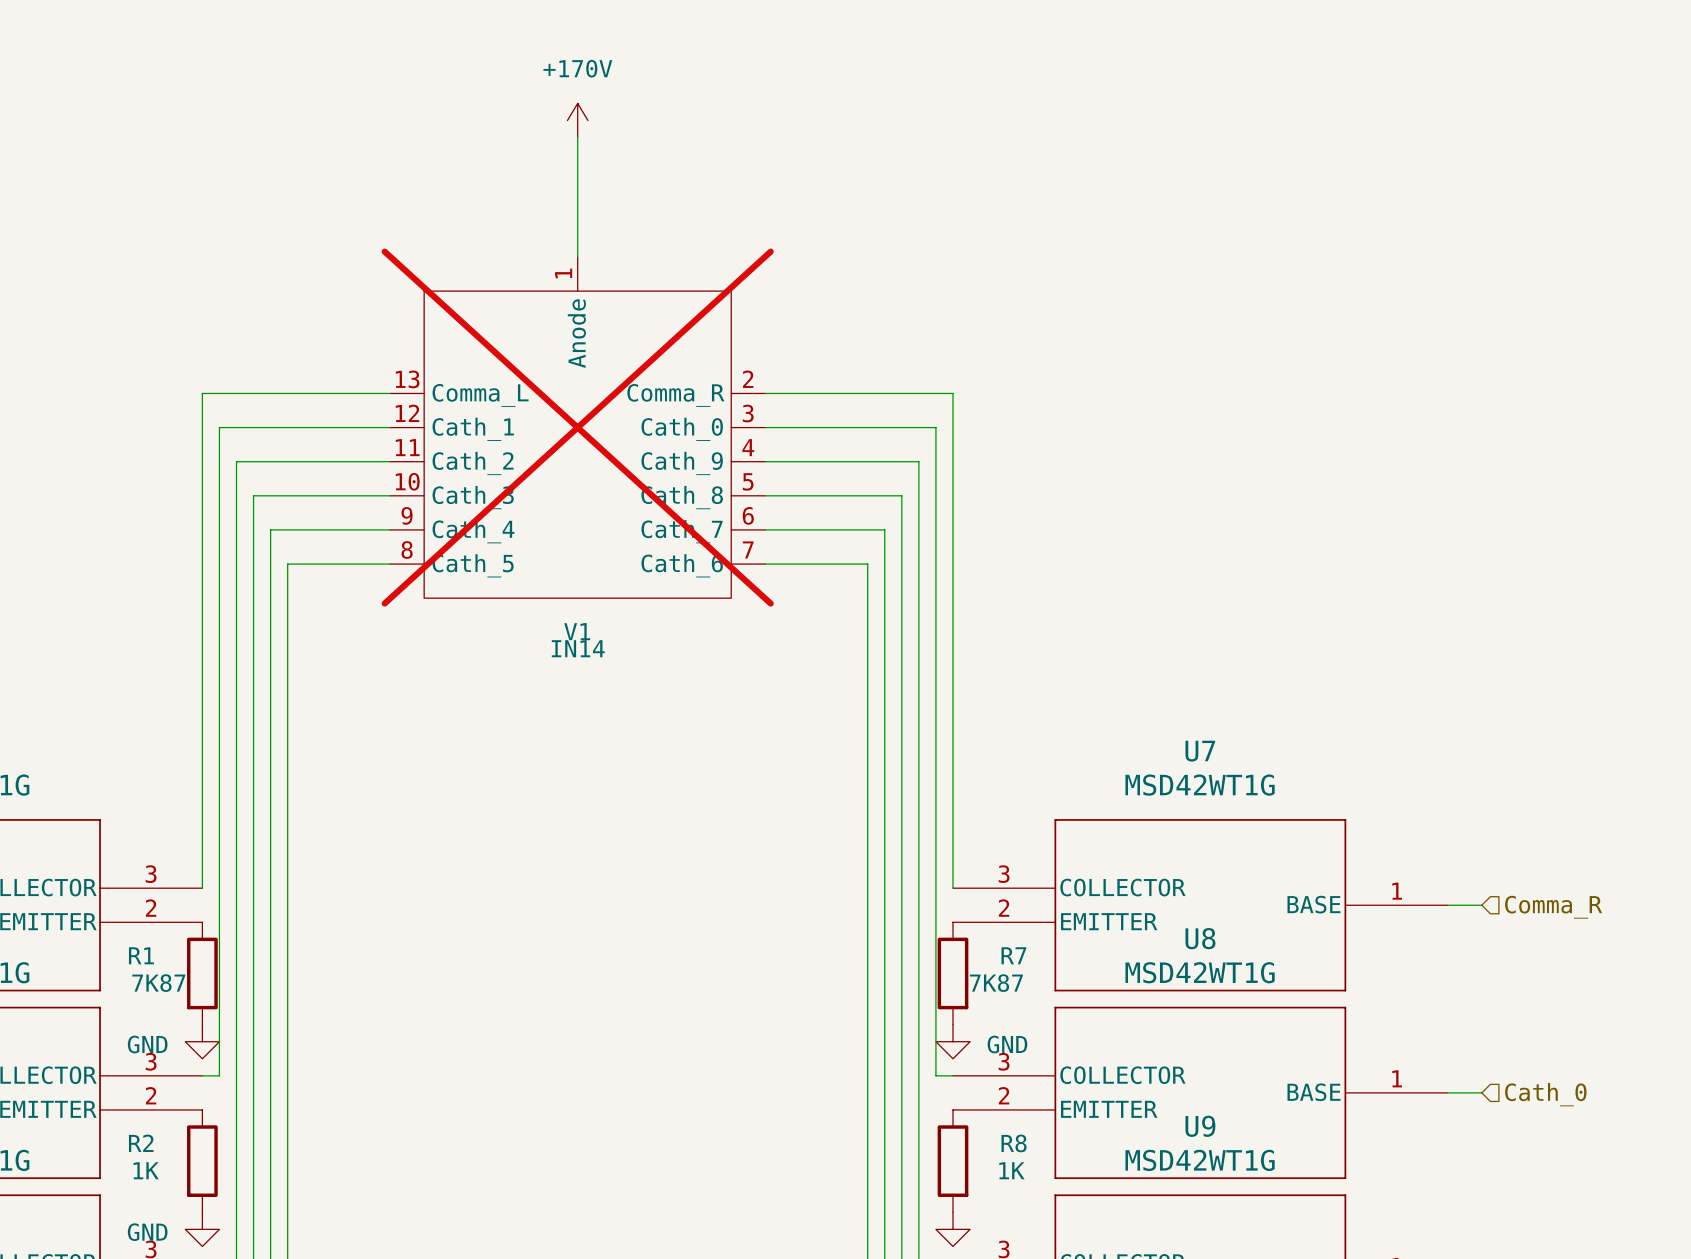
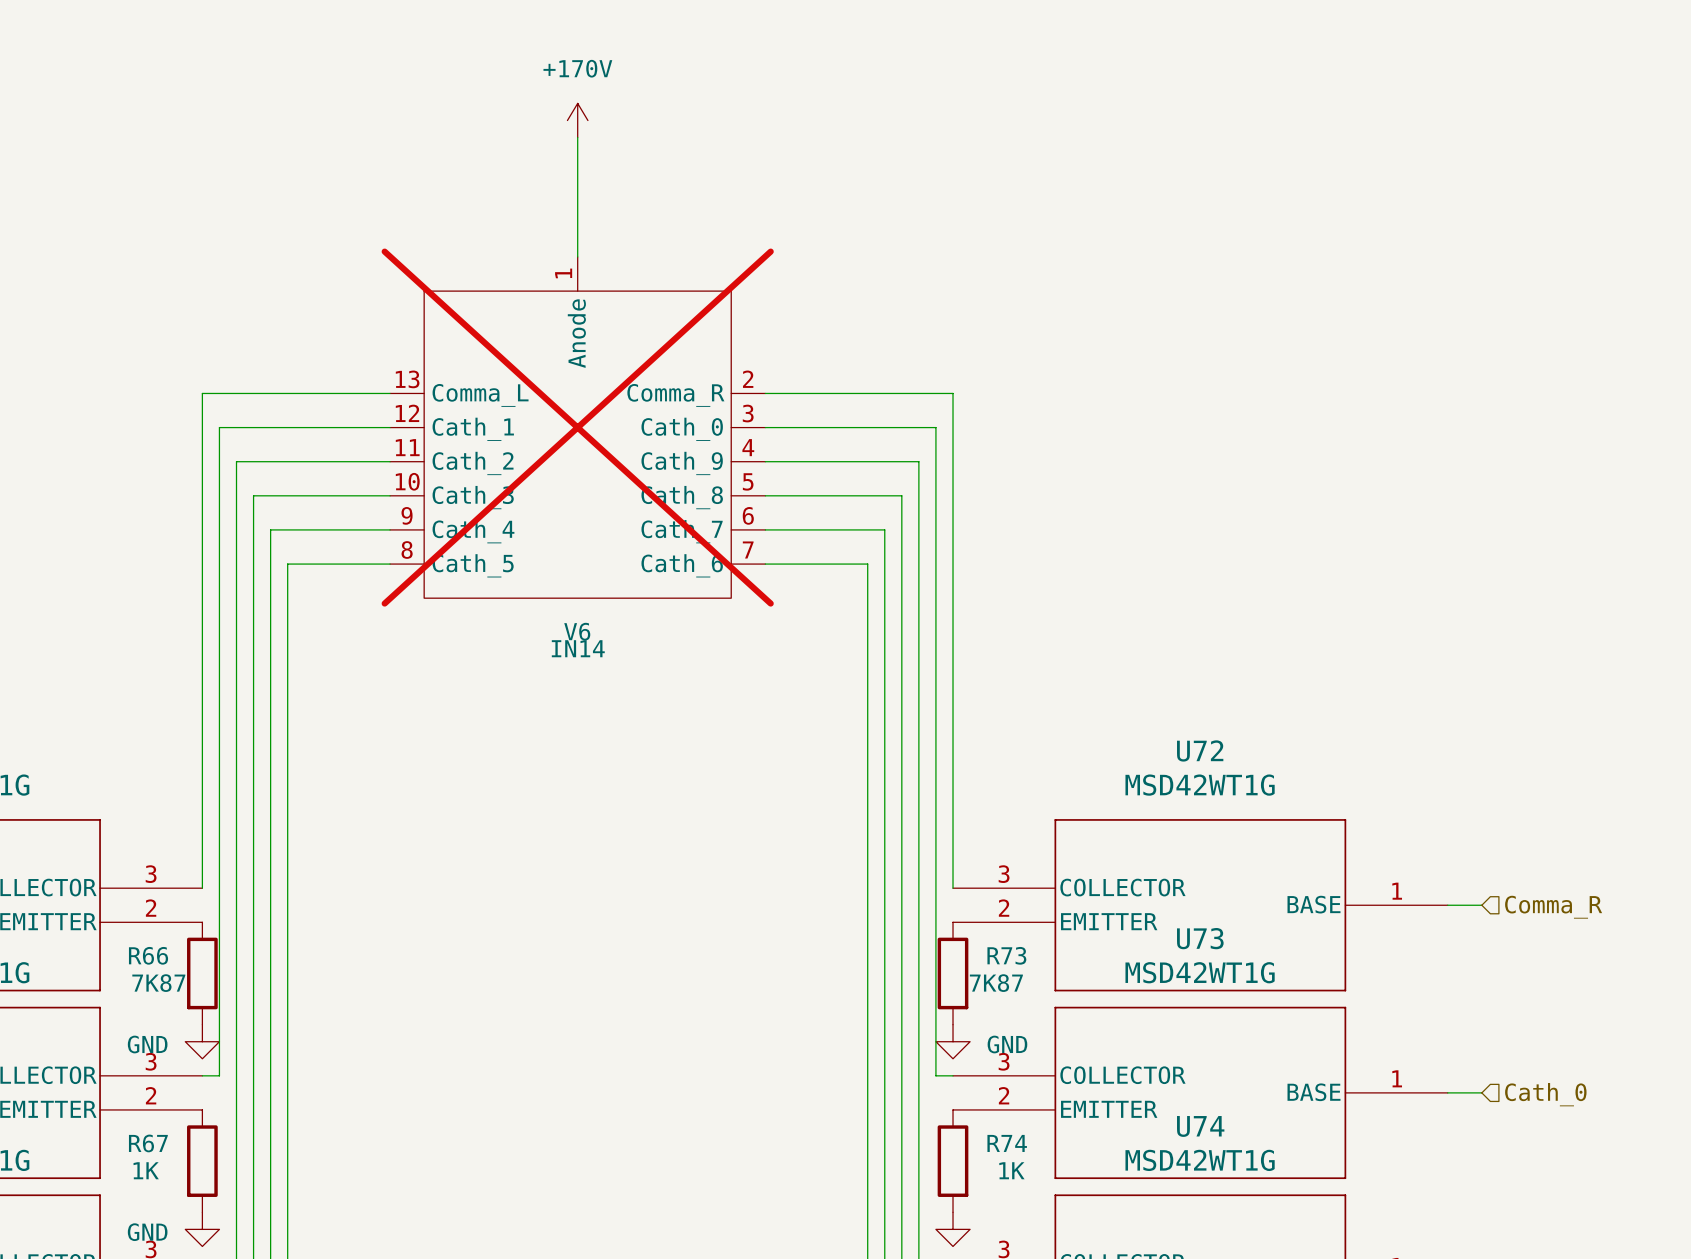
V1 name: V1 (577, 631) -> V6 (577, 631)
U7 name: U7 (1200, 751) -> U72 (1200, 750)
U8 name: U8 (1200, 938) -> U73 (1200, 938)
R1 name: R1 (141, 955) -> R66 (148, 955)
R7 name: R7 (1013, 955) -> R73 (1006, 955)
U9 name: U9 (1200, 1126) -> U74 (1200, 1126)
R2 name: R2 (141, 1143) -> R67 (148, 1143)
R8 name: R8 (1014, 1143) -> R74 (1007, 1143)

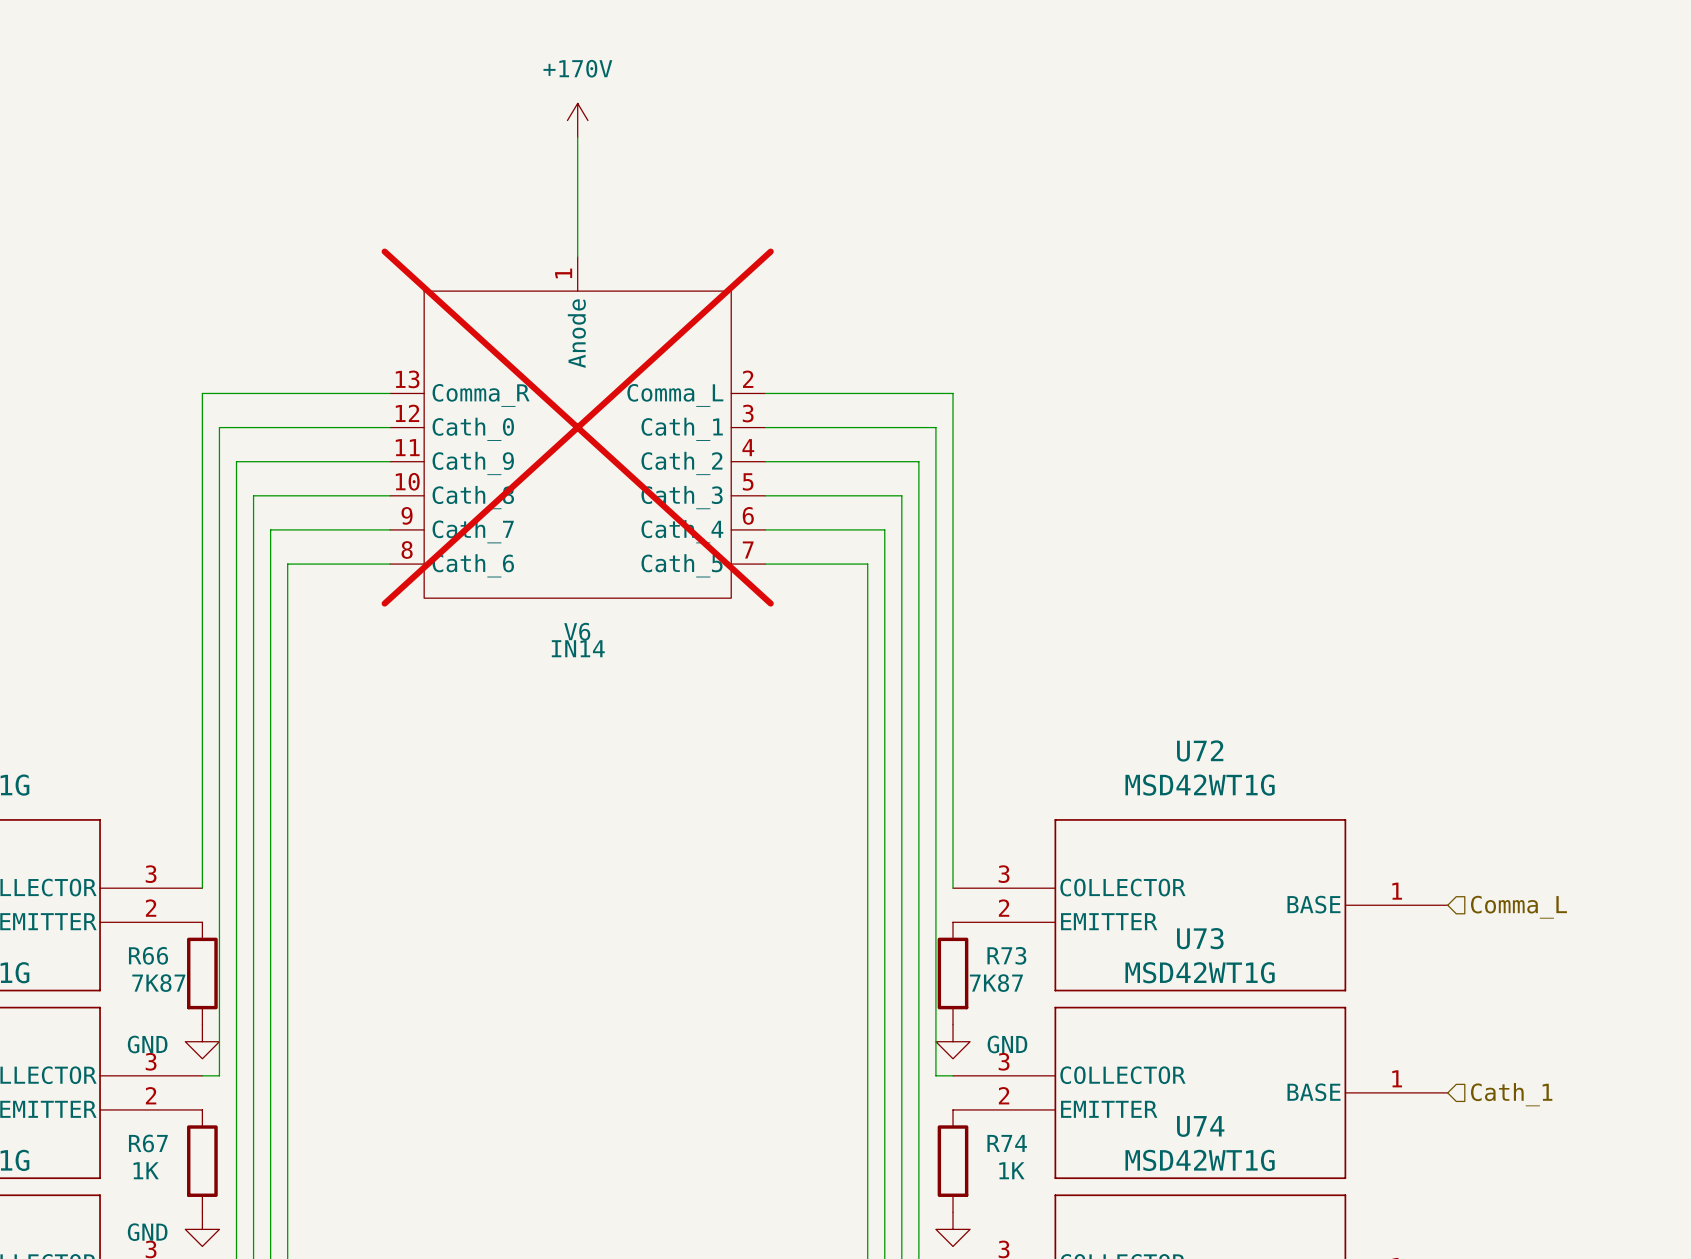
V6 symbol: [390, 256, 766, 599] -> [390, 256, 766, 599]
wire: (1447, 905) (1481, 905) -> none
hierarchical label: Comma_R (1553, 907) -> Comma_L (1518, 907)
wire: (1447, 1092) (1481, 1092) -> none
hierarchical label: Cath_0 (1545, 1094) -> Cath_1 (1511, 1094)

